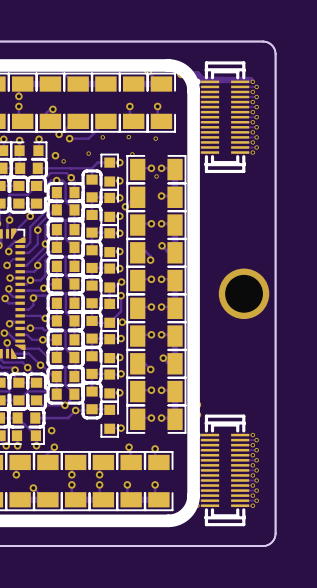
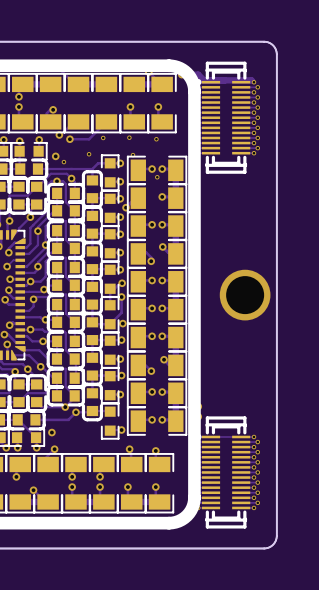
track: none -> (211, 436) (240, 436)

